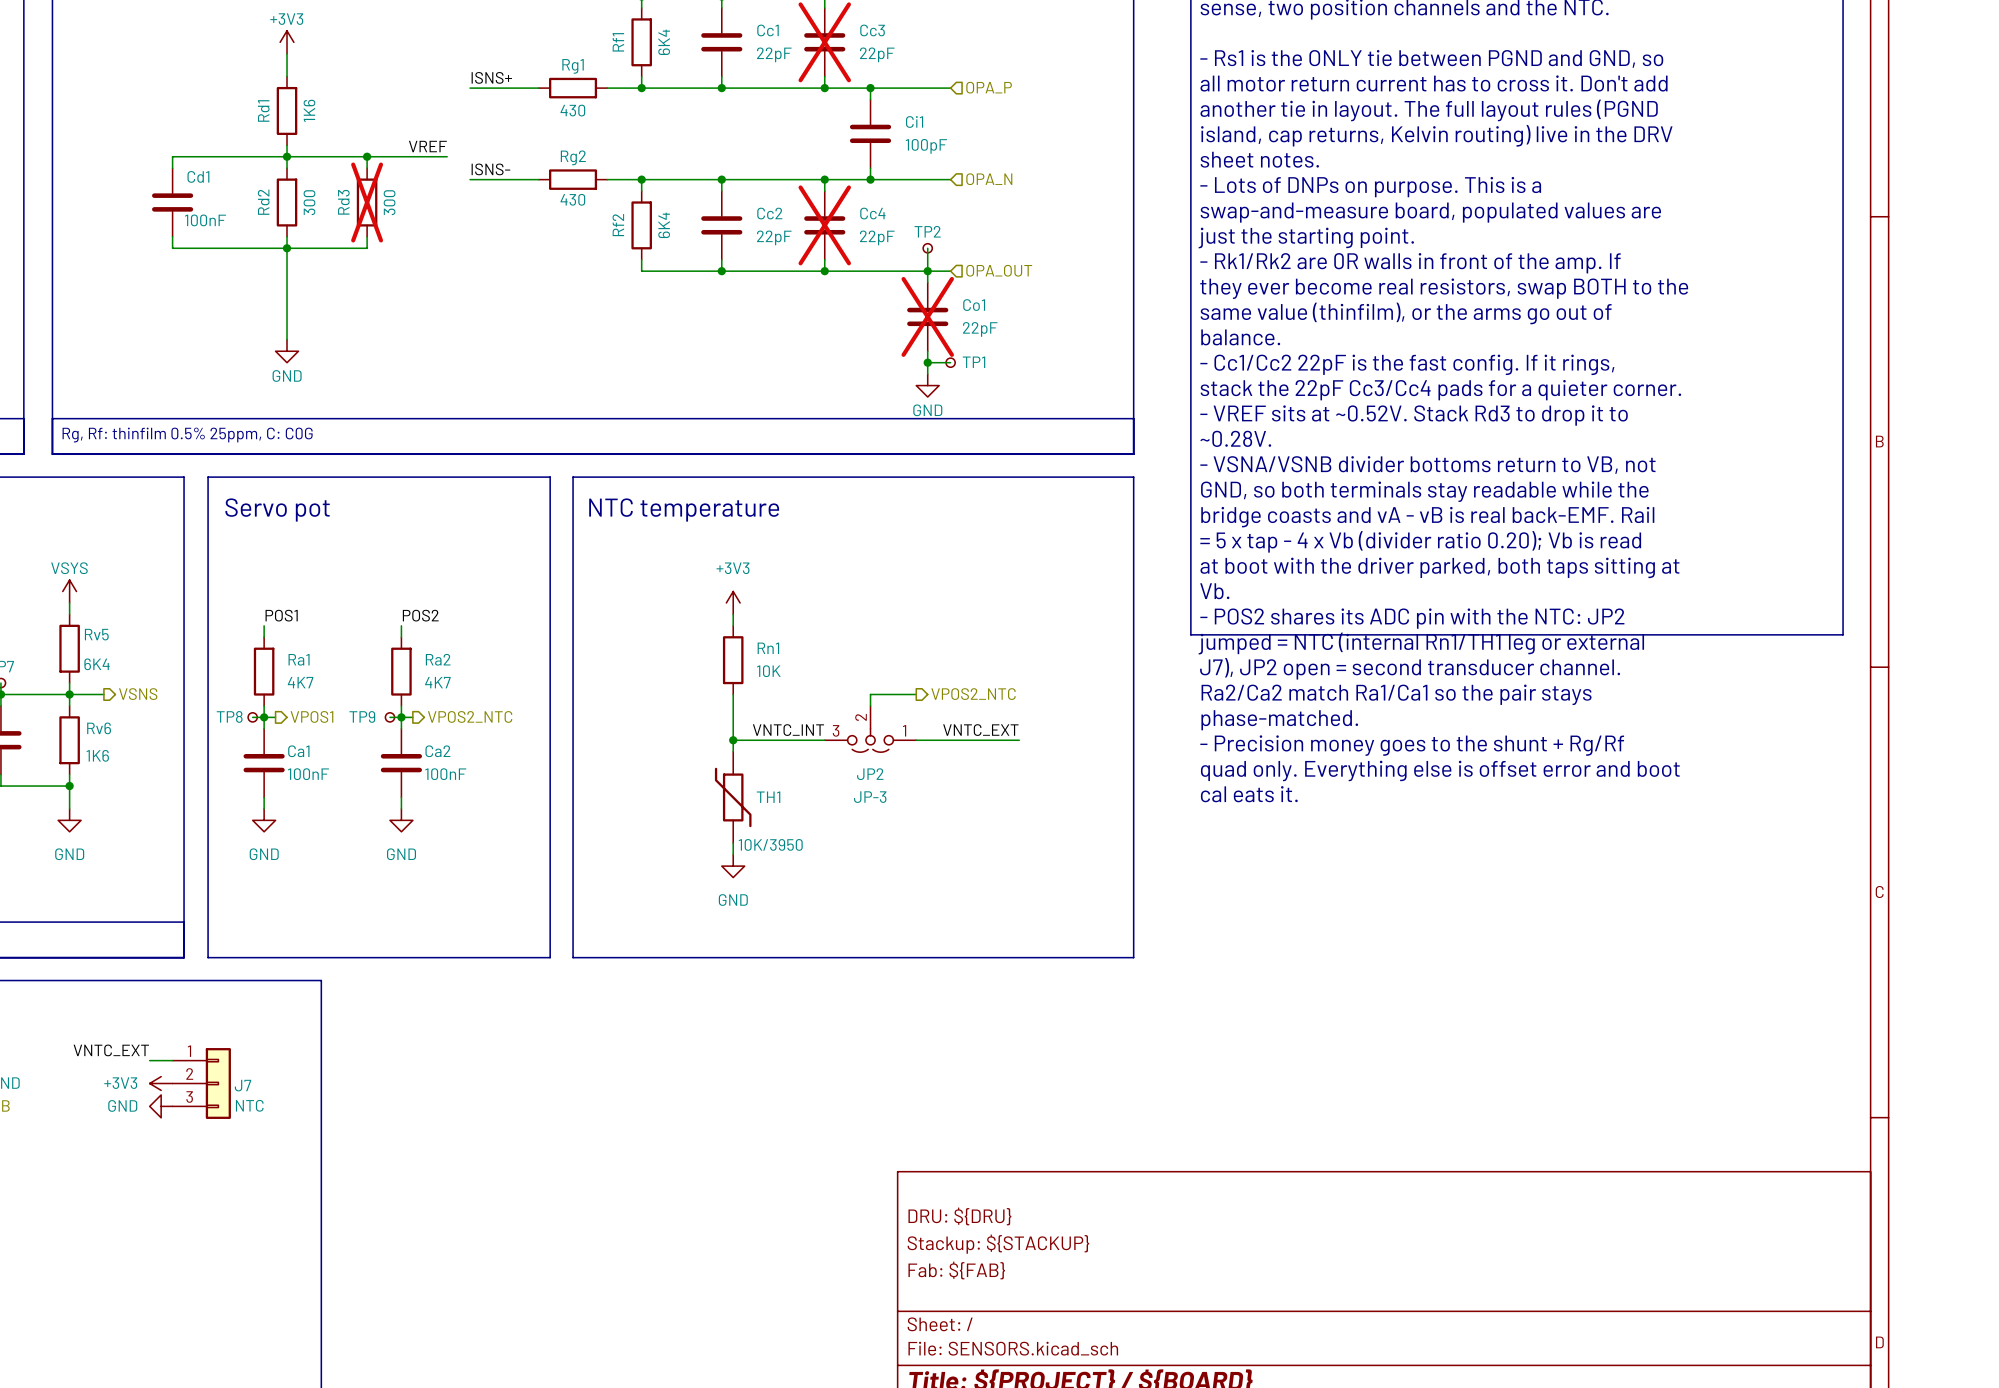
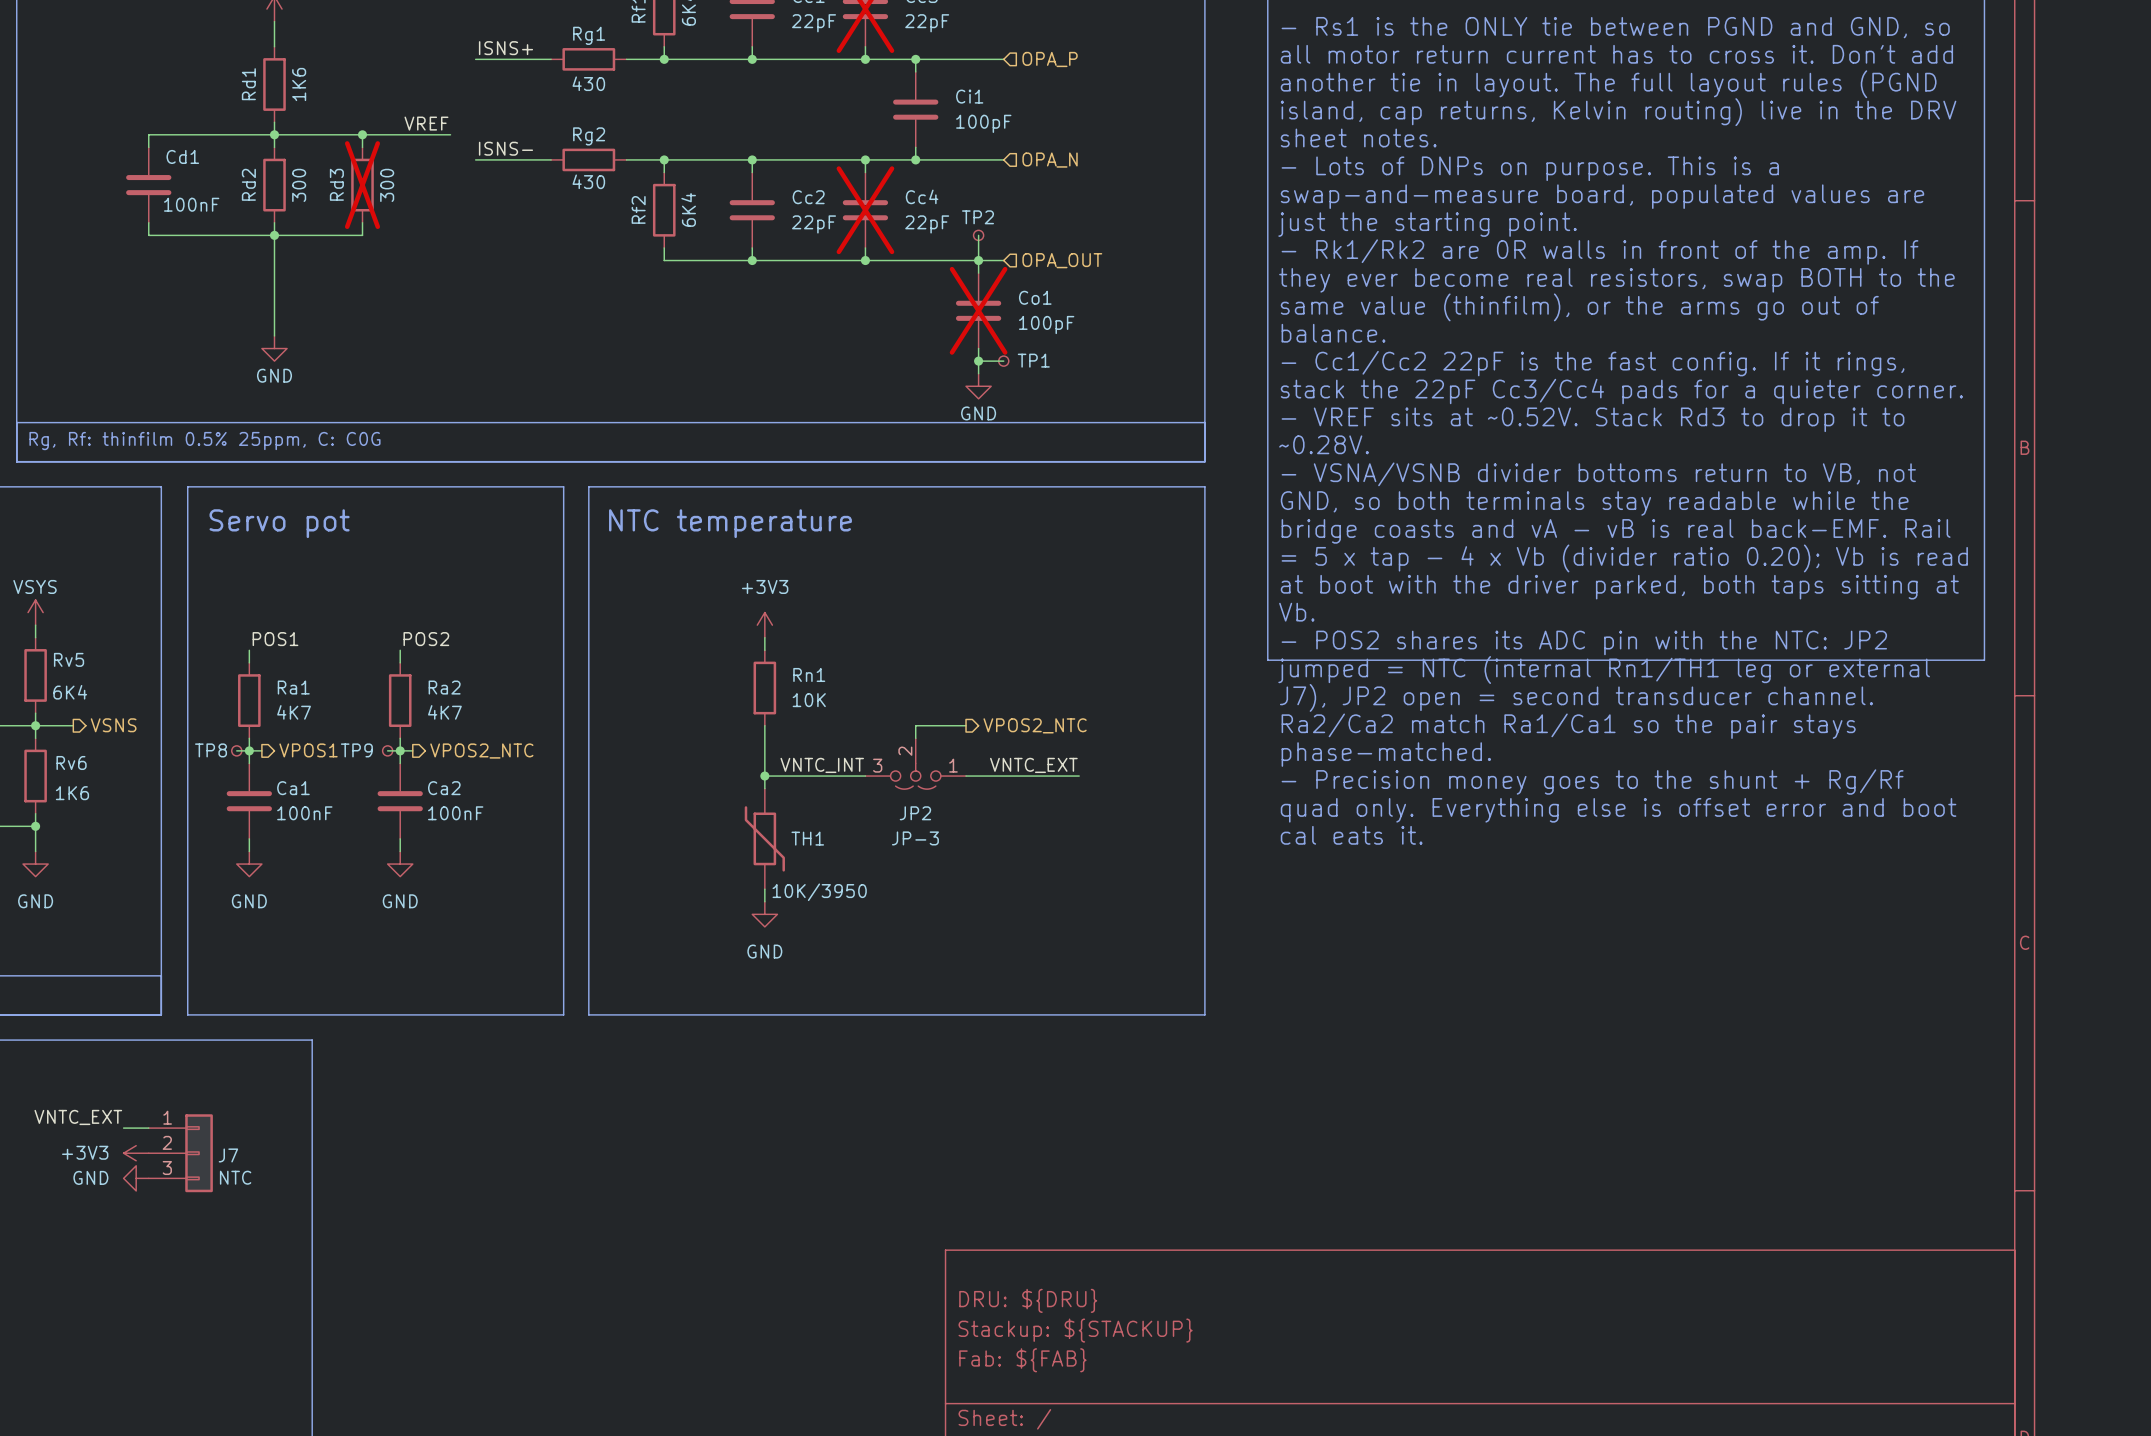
Co1 value: 22pF (980, 329) -> 100pF (1046, 325)

